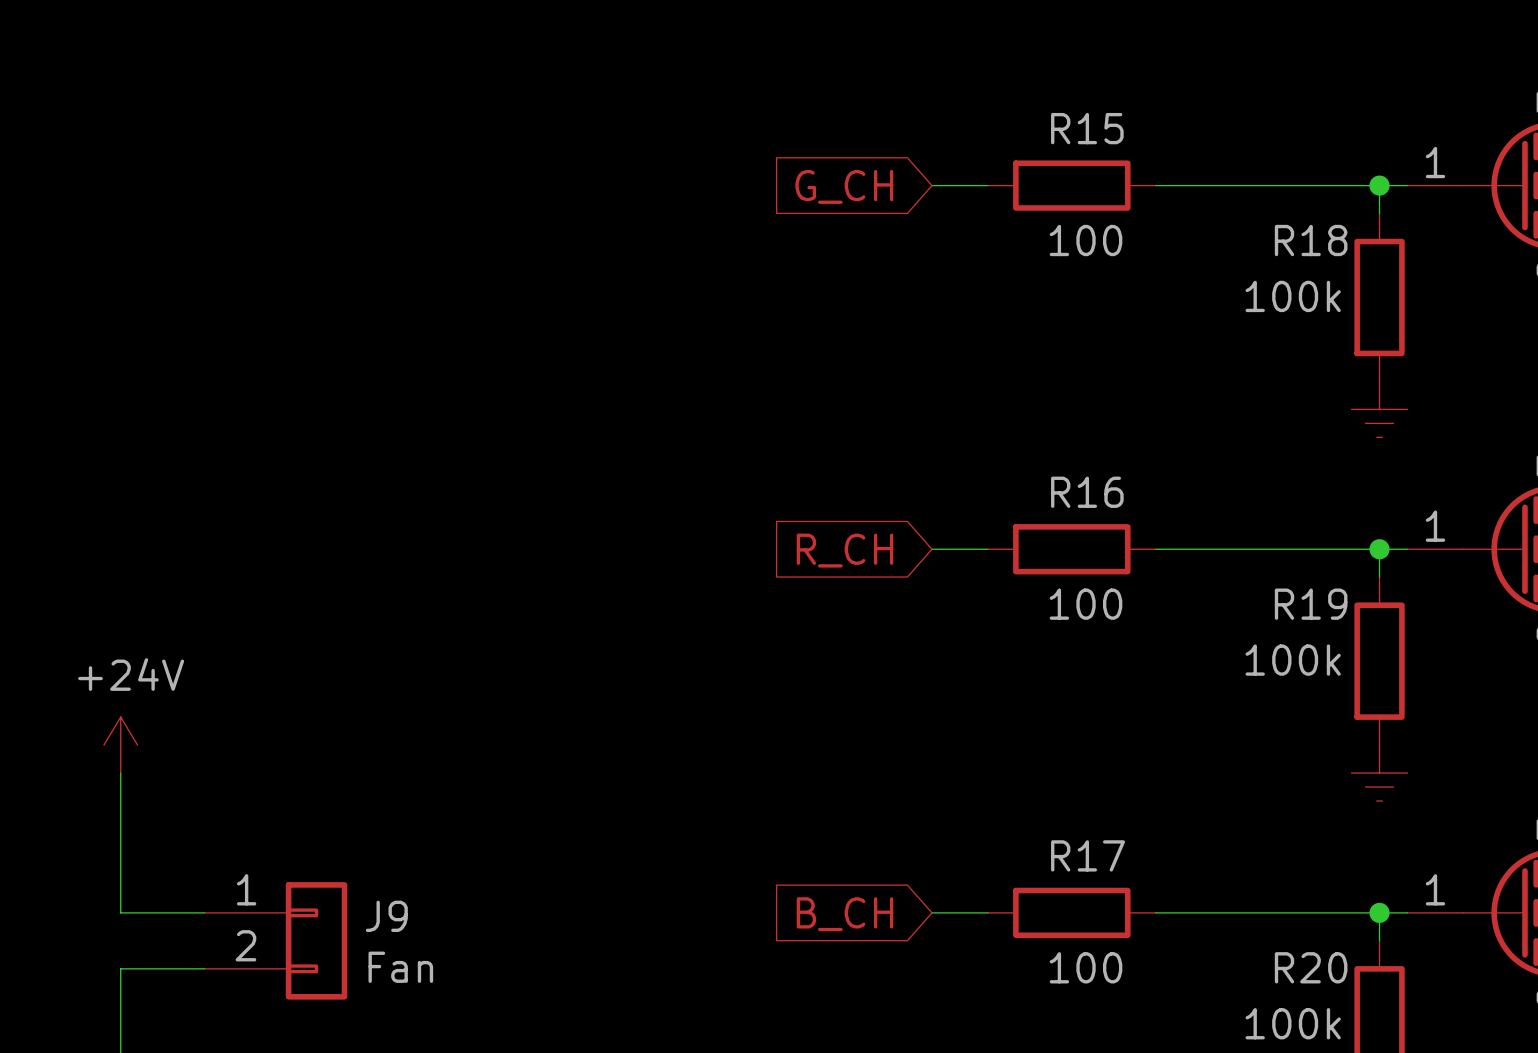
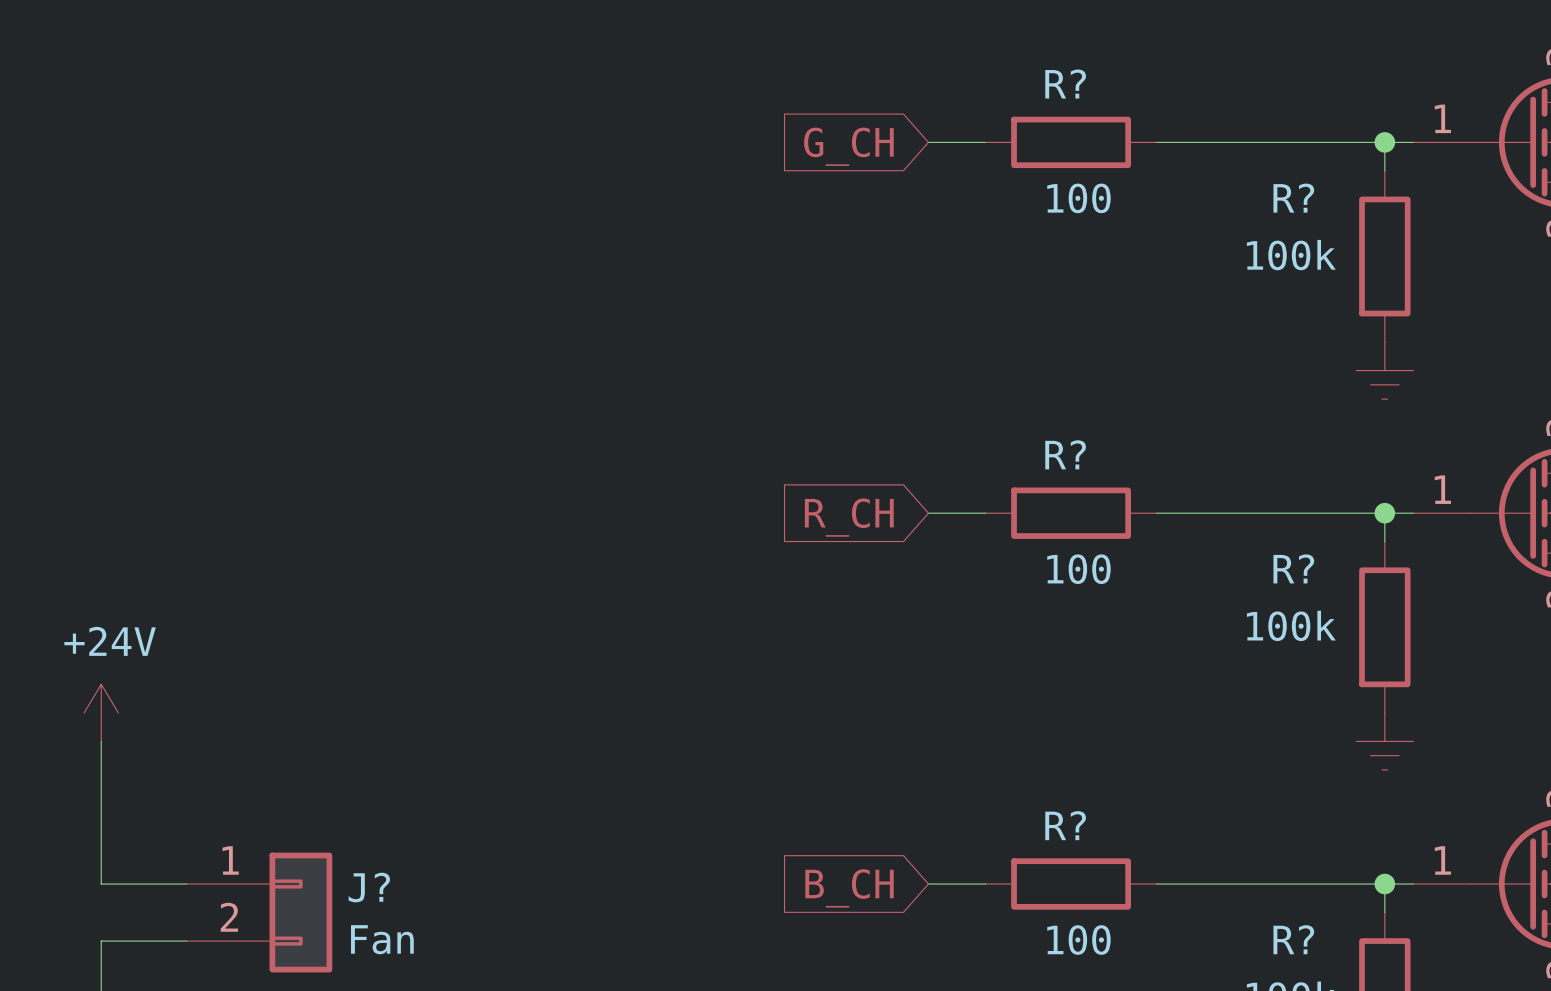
R15 name: R15 (1087, 128) -> R? (1065, 84)
R18 name: R18 (1311, 240) -> R? (1293, 198)
R16 name: R16 (1087, 492) -> R? (1065, 454)
R19 name: R19 (1311, 604) -> R? (1293, 568)
R17 name: R17 (1088, 855) -> R? (1065, 825)
J9 name: J9 (386, 916) -> J? (369, 887)
R20 name: R20 (1311, 967) -> R? (1293, 939)

